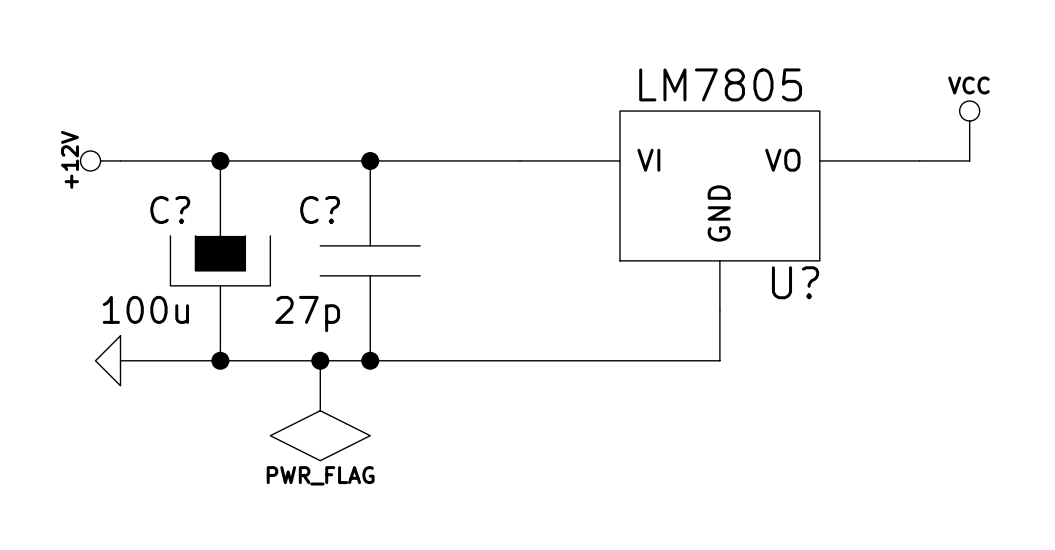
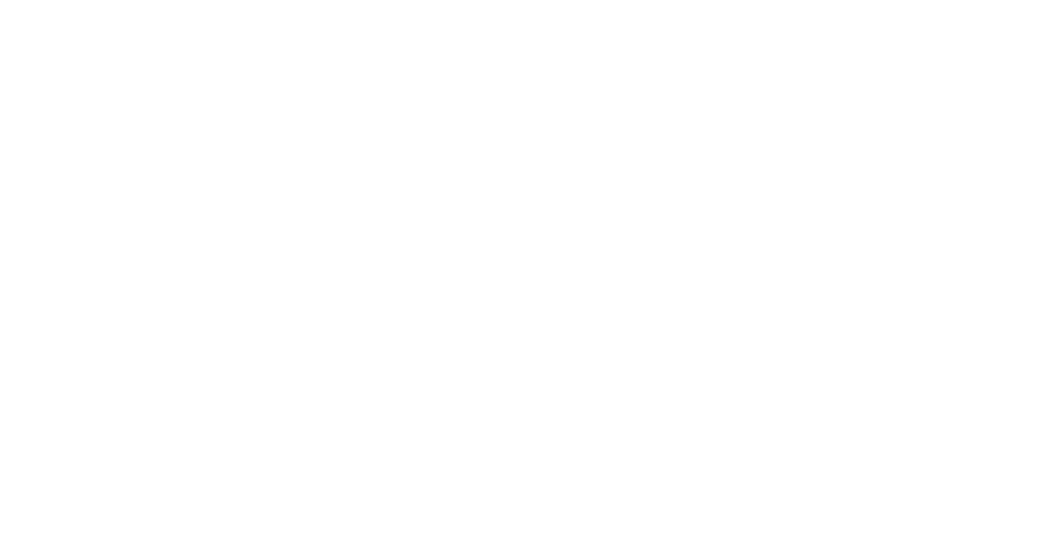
power symbol: VCC (969, 118) -> none
wire: (969, 136) (969, 160) (919, 160) -> none
power symbol: +12V (100, 160) -> none
wire: (120, 160) (520, 160) -> none
junction: (220, 160) -> none
junction: (370, 160) -> none
U?: LM7805 (719, 210) -> none
C?: 100u (220, 260) -> none
C?: 27p (370, 260) -> none
wire: (719, 310) (719, 360) (120, 360) -> none
power symbol: (108, 360) -> none
junction: (220, 360) -> none
junction: (320, 360) -> none
junction: (370, 360) -> none
power symbol: PWR_FLAG (320, 410) -> none

